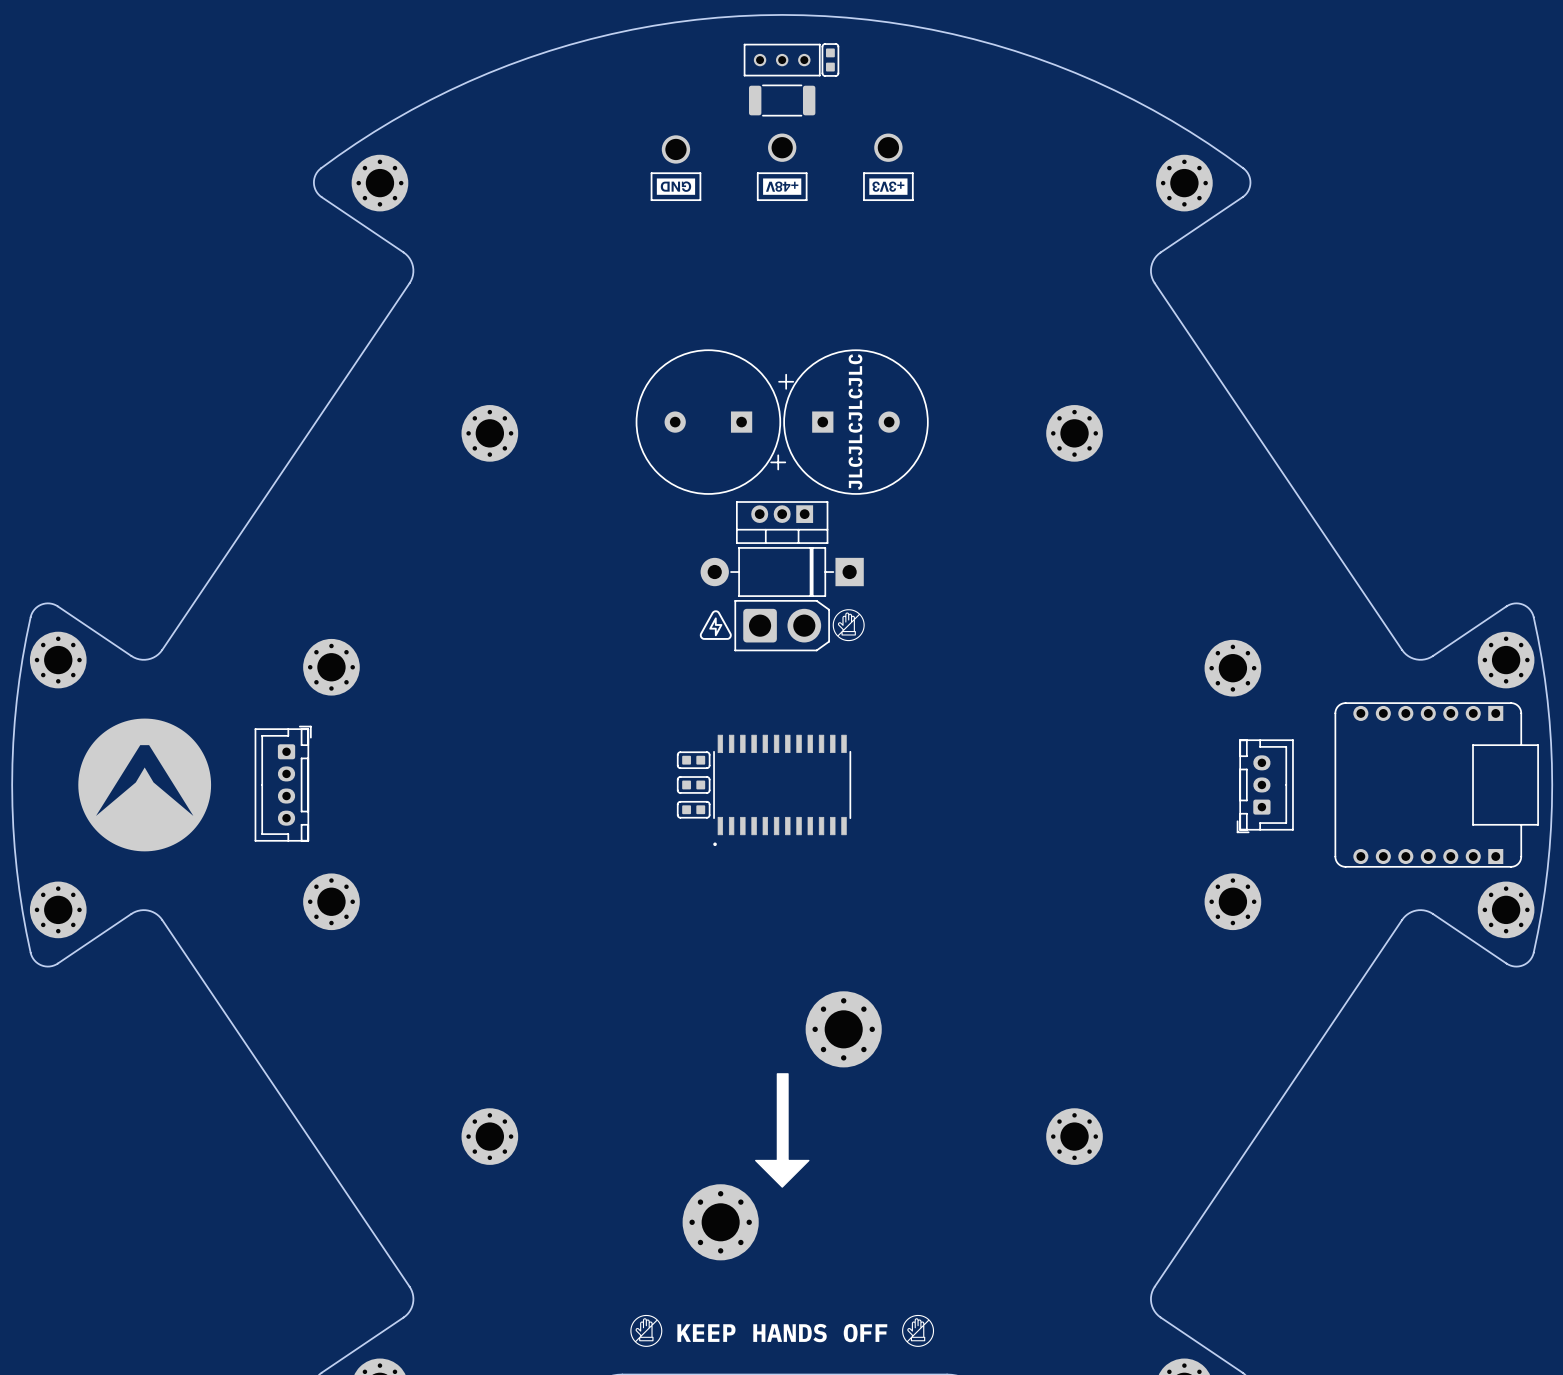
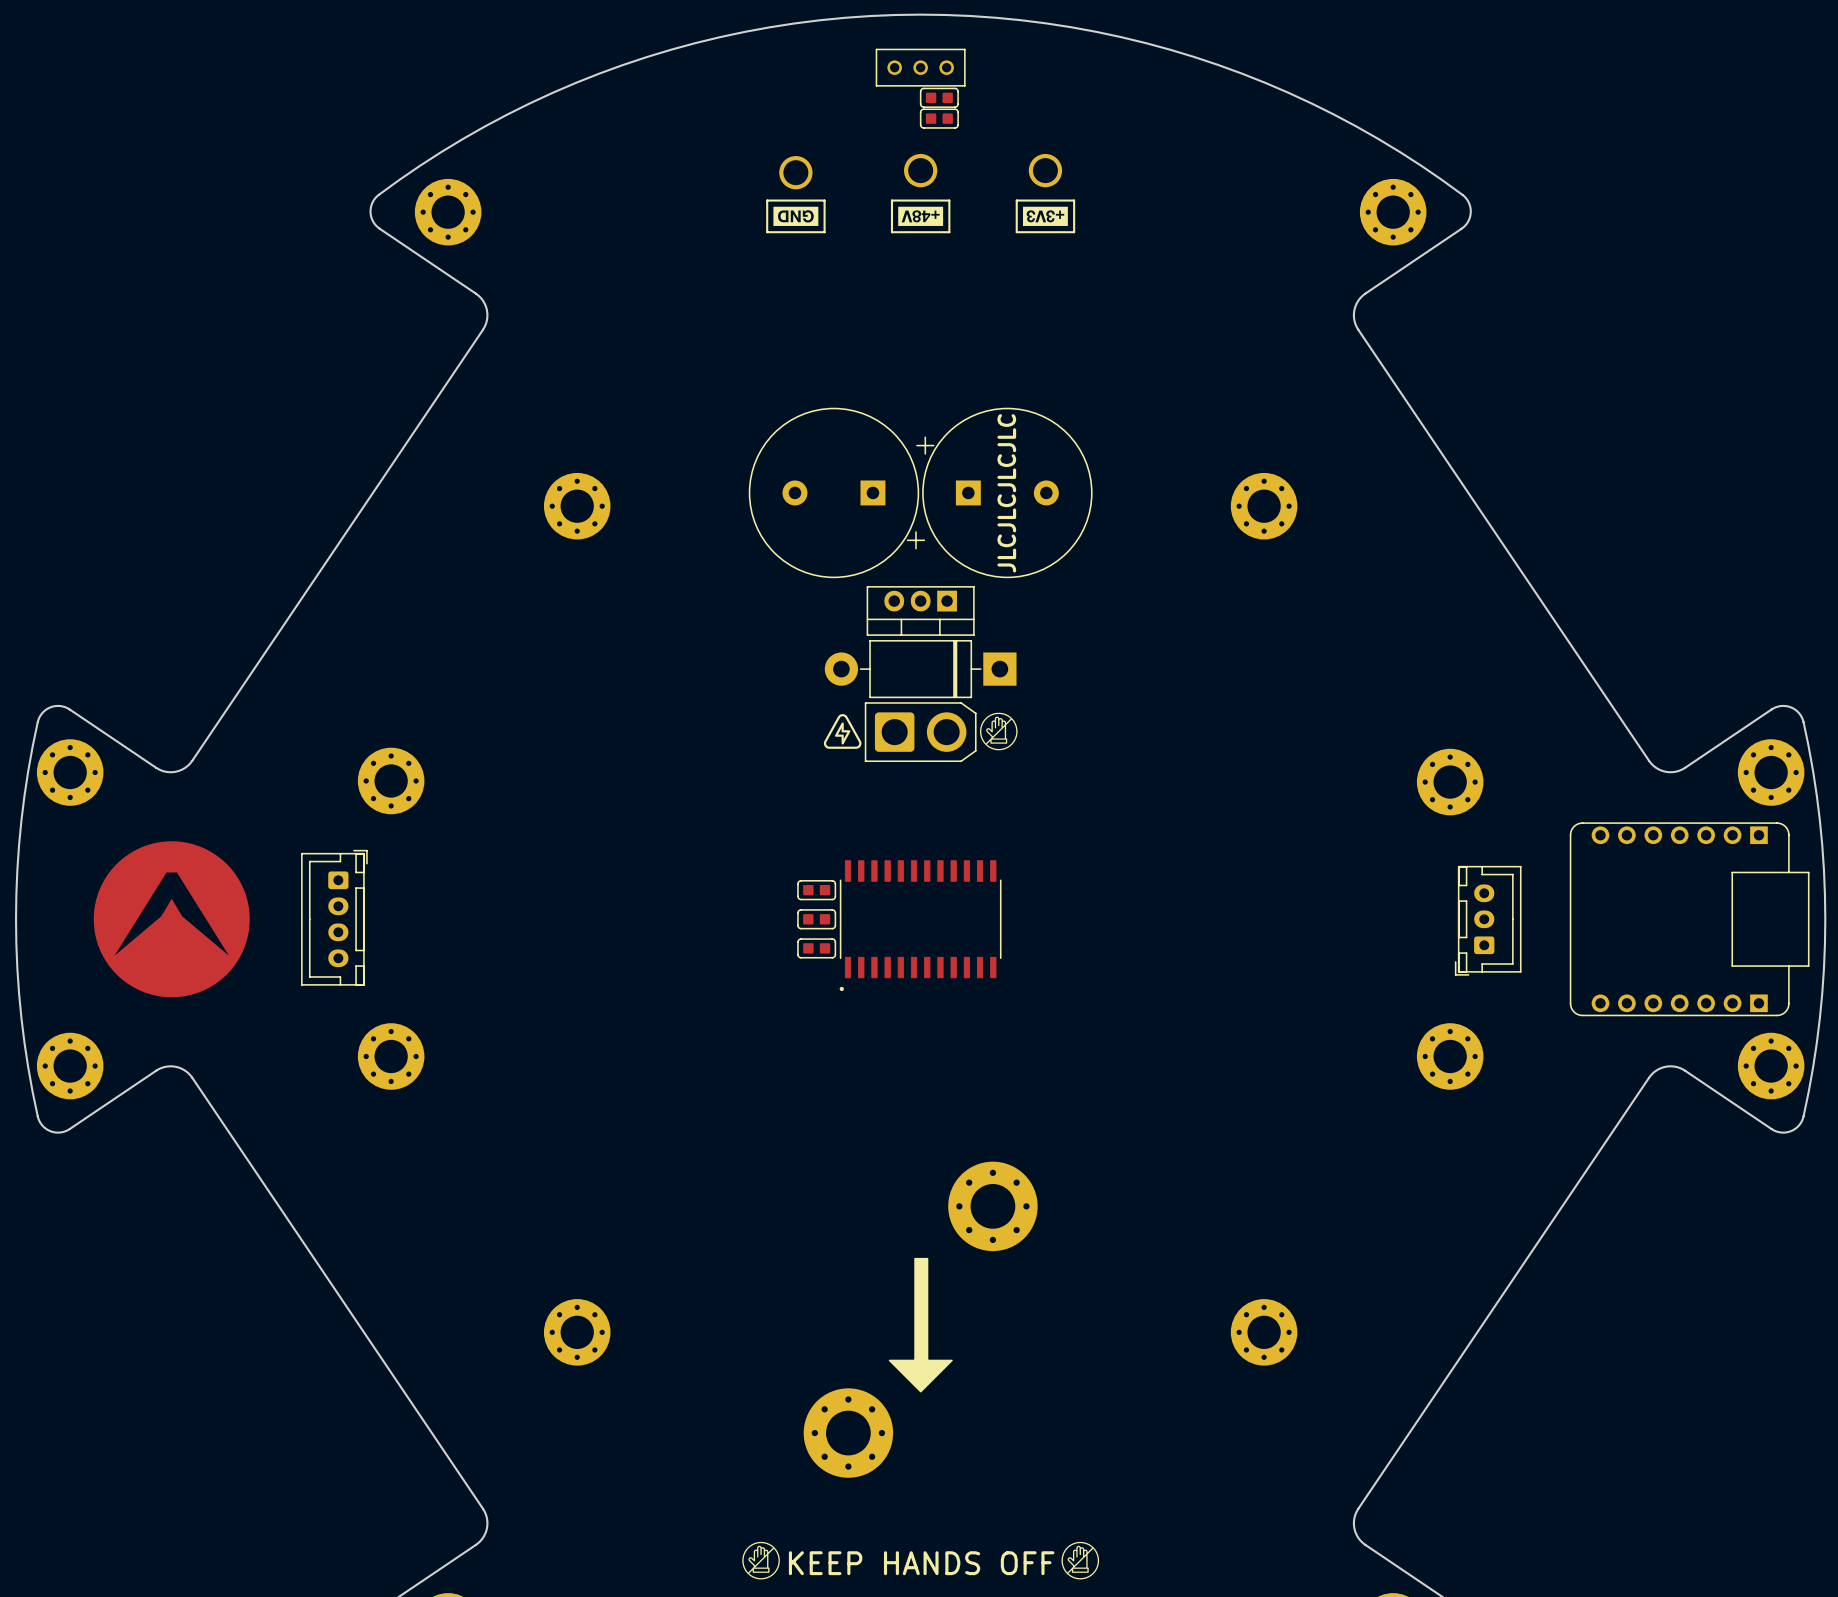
part: (830, 59) -> none
part: none -> (939, 97)
part: (782, 100) -> none
part: none -> (939, 118)

